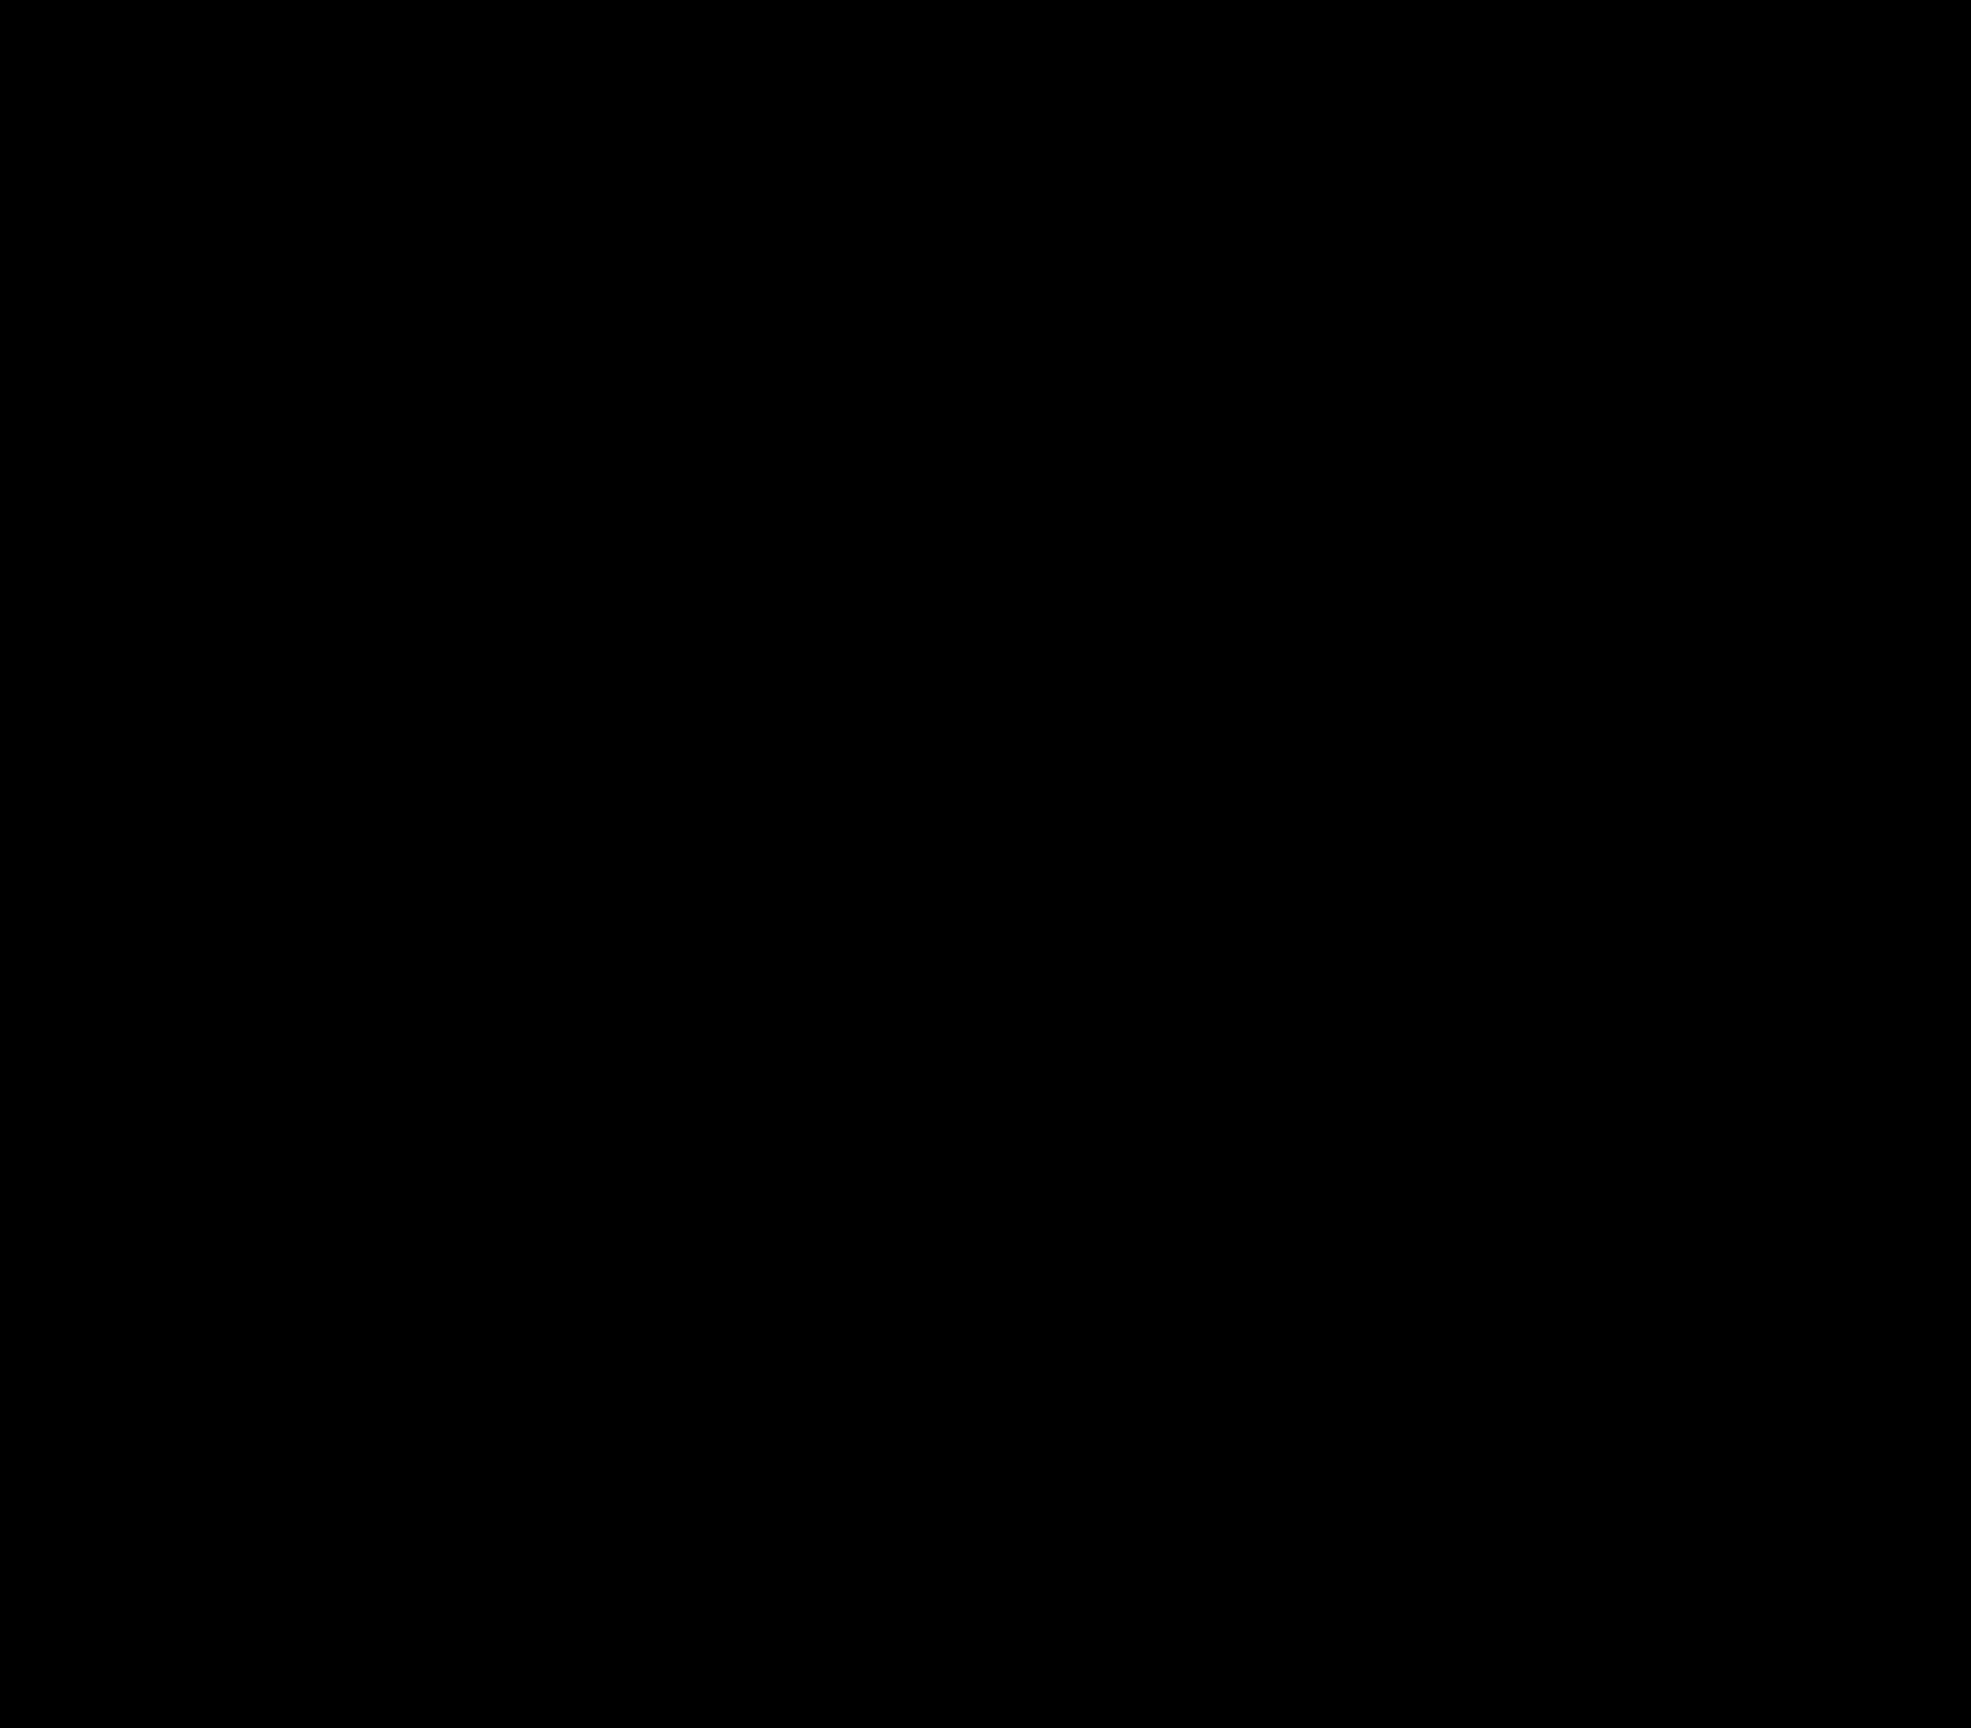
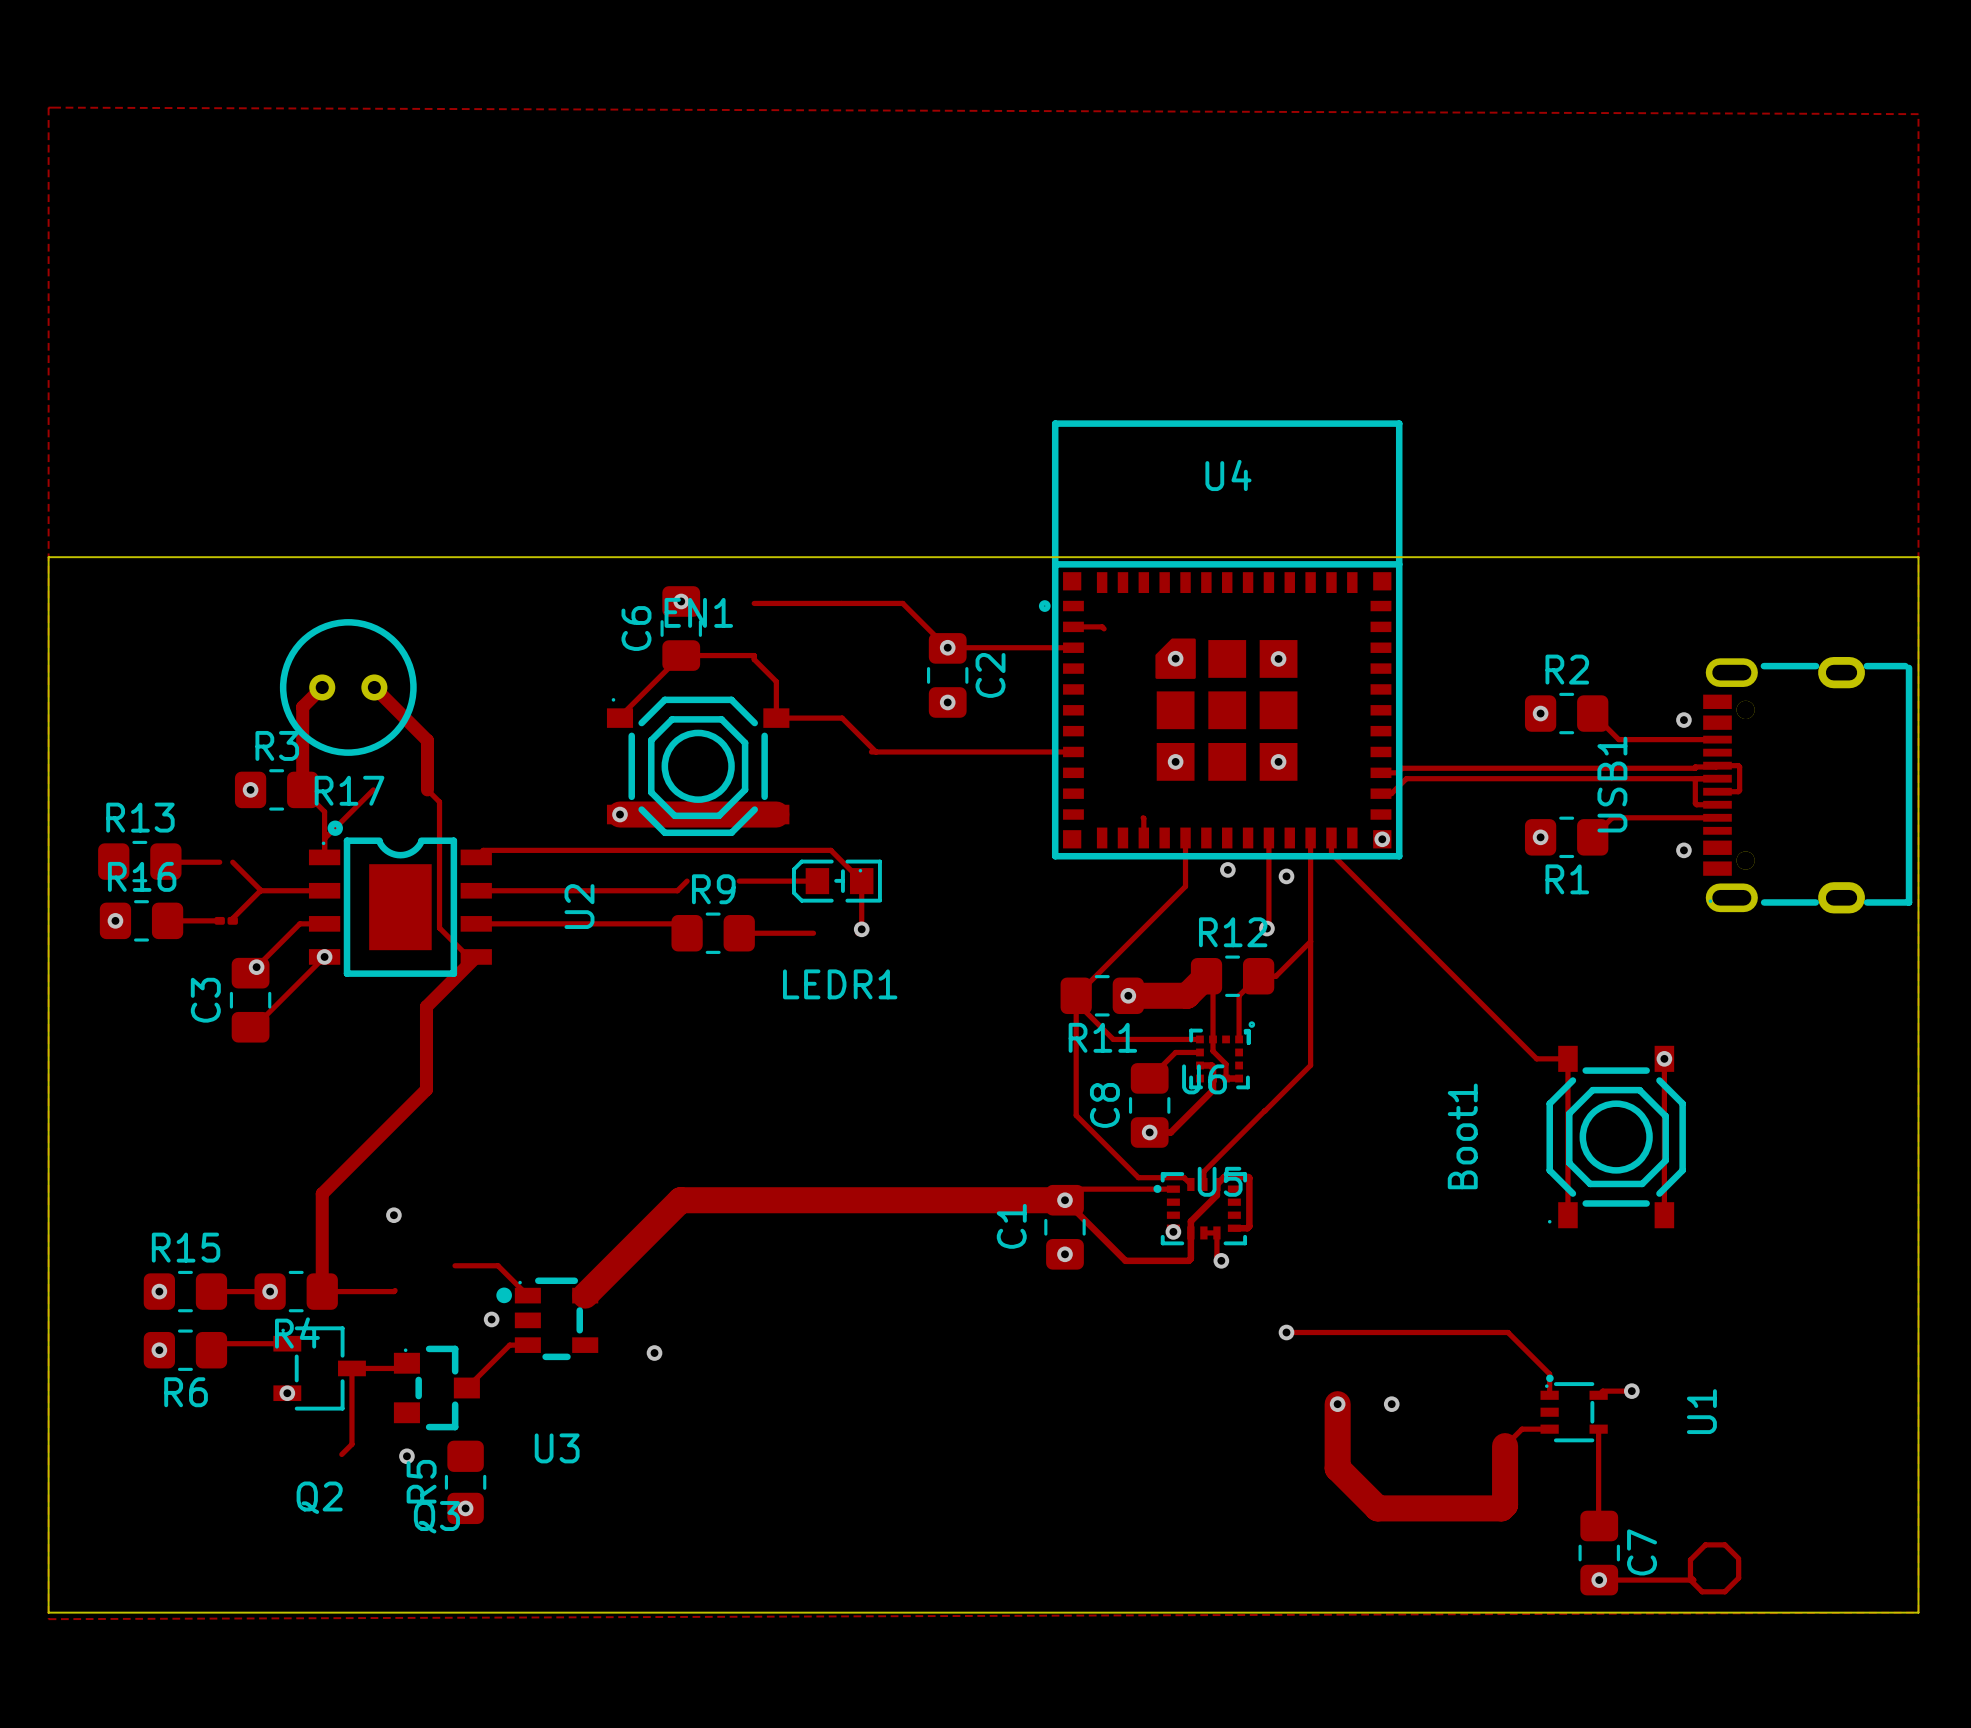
top zone outline: none -> (48, 107) (48, 1619) (1918, 1612) (1918, 114) (48, 107)
board edge: none -> (48, 557) (1918, 557) (1918, 1612) (48, 1612) (48, 557)
via: none -> (681, 601)
top track: none -> (754, 603) (902, 603) (947, 647) (1073, 647)
top track: none -> (1073, 626) (1102, 626) (1104, 628)
C6: none -> (681, 628)
U4: none -> (1220, 639)
via: none -> (947, 647)
via: none -> (1175, 658)
via: none -> (1278, 658)
C2: none -> (947, 675)
top track: none -> (322, 687) (302, 707) (302, 789) (324, 811) (324, 857)
R17: none -> (348, 687)
top track: none -> (374, 687) (427, 740) (427, 789) (439, 801) (439, 928) (468, 956) (476, 956) (426, 1006) (426, 1089) (322, 1193) (322, 1291) (395, 1290)
via: none -> (947, 702)
via: none -> (1540, 713)
R2: none -> (1566, 713)
top track: none -> (1592, 713) (1618, 739) (1717, 739)
top track: none -> (617, 715) (619, 718) (681, 655) (754, 655) (754, 659) (776, 681) (776, 718)
top track: none -> (776, 718) (842, 718) (876, 751)
via: none -> (1683, 720)
top track: none -> (871, 751) (1073, 751)
via: none -> (1175, 761)
via: none -> (1278, 761)
EN1: none -> (698, 766)
top track: none -> (1380, 772) (1397, 772) (1402, 768) (1695, 768) (1738, 765) (1739, 790) (1717, 791)
top track: none -> (1696, 778) (1695, 803) (1717, 804)
top track: none -> (1717, 778) (1406, 778) (1391, 793) (1380, 793)
USB1: none -> (1807, 785)
via: none -> (250, 789)
R3: none -> (276, 789)
top track: none -> (373, 789) (324, 838)
top track: none -> (619, 814) (776, 814)
via: none -> (619, 814)
top track: none -> (1143, 817) (1143, 837)
top track: none -> (1717, 817) (1612, 817) (1592, 837)
top track: none -> (1185, 837) (1185, 886) (1076, 995) (1076, 1115) (1138, 1177) (1184, 1177) (1190, 1184)
top track: none -> (1268, 837) (1268, 926) (1266, 928)
top track: none -> (1310, 837) (1310, 1065) (1265, 1110)
top track: none -> (1331, 837) (1331, 853) (1536, 1058) (1567, 1058) (1567, 1215)
via: none -> (1540, 837)
R1: none -> (1566, 837)
via: none -> (1382, 839)
via: none -> (1683, 850)
top track: none -> (476, 857) (483, 850) (830, 850) (861, 881) (861, 929) (857, 933)
R13: none -> (139, 861)
top track: none -> (165, 861) (219, 862)
top track: none -> (232, 862) (261, 890) (324, 890)
via: none -> (1227, 869)
via: none -> (1286, 876)
top track: none -> (687, 881) (677, 890) (476, 890)
top track: none -> (739, 881) (817, 881)
LEDR1: none -> (836, 881)
top track: none -> (260, 890) (232, 918) (232, 920)
U2: none -> (400, 898)
via: none -> (115, 920)
R16: none -> (141, 920)
top track: none -> (167, 920) (219, 920)
part: none -> (226, 920)
top track: none -> (324, 923) (299, 923) (250, 973)
top track: none -> (476, 923) (677, 923) (687, 933)
via: none -> (1266, 928)
via: none -> (861, 929)
R9: none -> (713, 933)
top track: none -> (739, 933) (813, 933)
top track: none -> (1310, 941) (1275, 976) (1258, 976) (1239, 995) (1239, 1039)
top track: none -> (324, 956) (254, 1027) (250, 1027)
via: none -> (324, 956)
via: none -> (256, 967)
R12: none -> (1232, 976)
top track: none -> (1069, 995) (1113, 1039) (1199, 1039)
R11: none -> (1102, 995)
top track: none -> (1128, 995) (1186, 995) (1206, 976) (1213, 982) (1213, 1051) (1226, 1064) (1226, 1078) (1239, 1078)
via: none -> (1128, 995)
C3: none -> (250, 1000)
top track: none -> (1199, 1052) (1175, 1052) (1149, 1078)
U5: none -> (1222, 1055)
top track: none -> (1664, 1058) (1664, 1215)
via: none -> (1664, 1058)
top track: none -> (1199, 1065) (1213, 1066) (1213, 1090) (1170, 1132) (1149, 1132)
C8: none -> (1149, 1105)
top track: none -> (1264, 1110) (1203, 1171) (1203, 1184)
via: none -> (1149, 1132)
Boot1: none -> (1616, 1137)
top track: none -> (1173, 1189) (1076, 1189) (1064, 1200)
top track: none -> (1064, 1200) (680, 1200) (585, 1295)
top track: none -> (1064, 1200) (1125, 1260) (1188, 1260) (1190, 1258) (1190, 1221) (1216, 1195) (1216, 1184) (1224, 1177) (1248, 1177) (1249, 1226) (1247, 1228) (1234, 1228)
via: none -> (1064, 1200)
U6: none -> (1200, 1208)
via: none -> (393, 1215)
C1: none -> (1064, 1227)
via: none -> (1173, 1231)
top track: none -> (1203, 1232) (1216, 1232) (1216, 1256) (1221, 1260)
via: none -> (1064, 1254)
via: none -> (1221, 1260)
top track: none -> (455, 1265) (498, 1265) (527, 1295)
via: none -> (159, 1291)
R15: none -> (185, 1291)
top track: none -> (211, 1291) (270, 1291)
via: none -> (270, 1291)
R4: none -> (296, 1291)
U3: none -> (547, 1318)
via: none -> (491, 1319)
top track: none -> (1286, 1332) (1508, 1332) (1549, 1374) (1549, 1395)
via: none -> (1286, 1332)
top track: none -> (287, 1343) (218, 1343) (211, 1350)
top track: none -> (527, 1345) (509, 1345) (466, 1388)
via: none -> (159, 1350)
R6: none -> (185, 1350)
via: none -> (654, 1353)
top track: none -> (406, 1363) (401, 1368) (351, 1368) (351, 1444) (341, 1454)
Q2: none -> (319, 1368)
Q3: none -> (436, 1388)
top track: none -> (1631, 1391) (1602, 1391) (1598, 1395)
via: none -> (1631, 1391)
via: none -> (287, 1393)
top track: none -> (1337, 1404) (1337, 1468) (1377, 1508) (1501, 1508) (1505, 1504) (1505, 1446) (1507, 1449)
via: none -> (1337, 1404)
via: none -> (1391, 1404)
U1: none -> (1574, 1408)
top track: none -> (1549, 1429) (1522, 1429) (1507, 1443)
top track: none -> (1598, 1429) (1599, 1525)
via: none -> (406, 1456)
R5: none -> (465, 1482)
via: none -> (465, 1508)
C7: none -> (1599, 1553)
top track: none -> (1738, 1558) (1724, 1544) (1705, 1544) (1690, 1559) (1690, 1576) (1693, 1580) (1599, 1580)
top track: none -> (1738, 1560) (1738, 1578) (1724, 1591) (1702, 1591) (1690, 1580)
via: none -> (1599, 1580)

